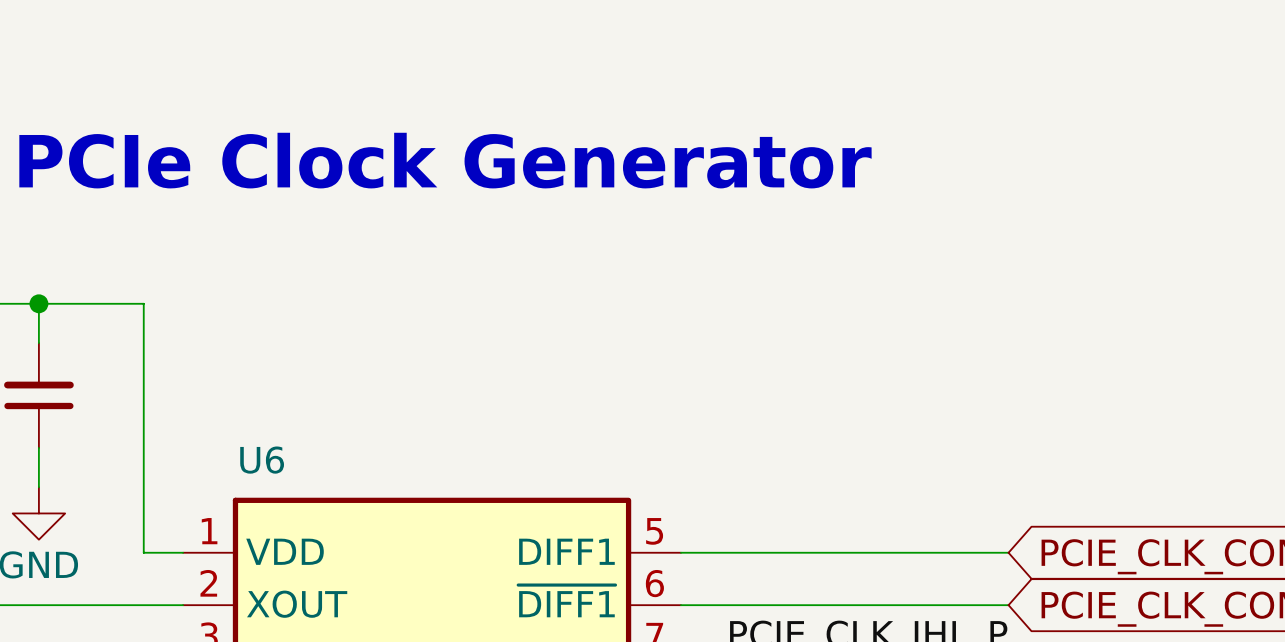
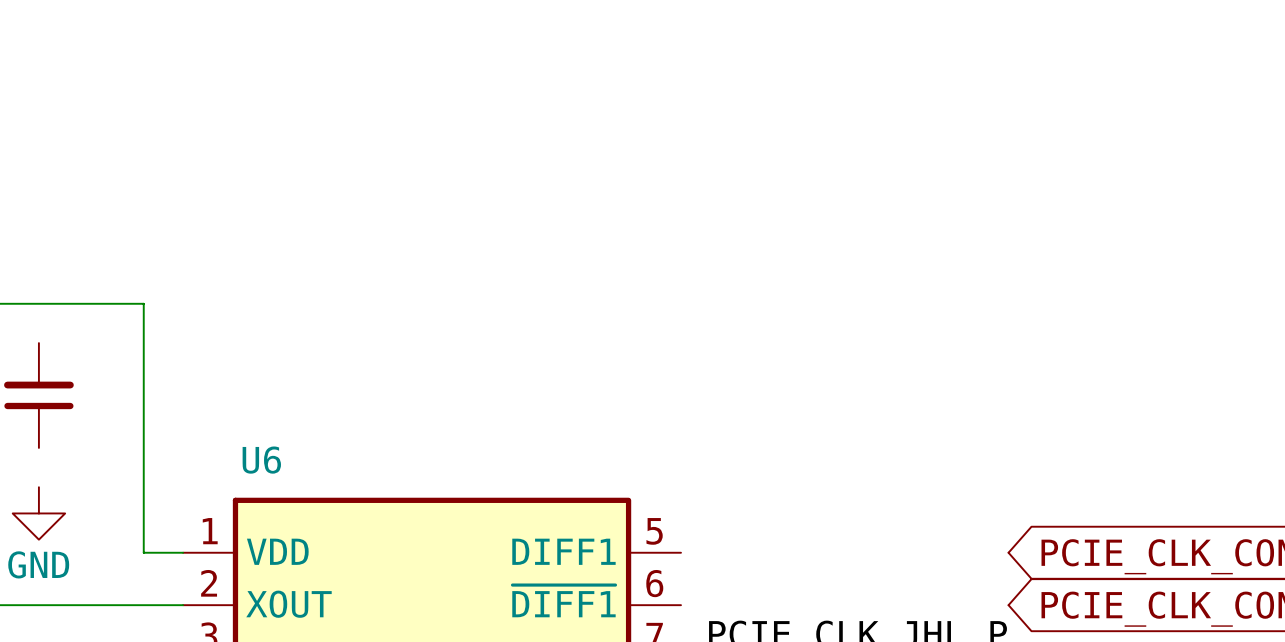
text: PCIe Clock Generator (445, 160) -> none
wire: (38, 303) (38, 343) -> none
junction: (38, 303) -> none
wire: (38, 447) (38, 487) -> none
wire: (680, 552) (1008, 552) -> none
wire: (680, 605) (1008, 605) -> none

